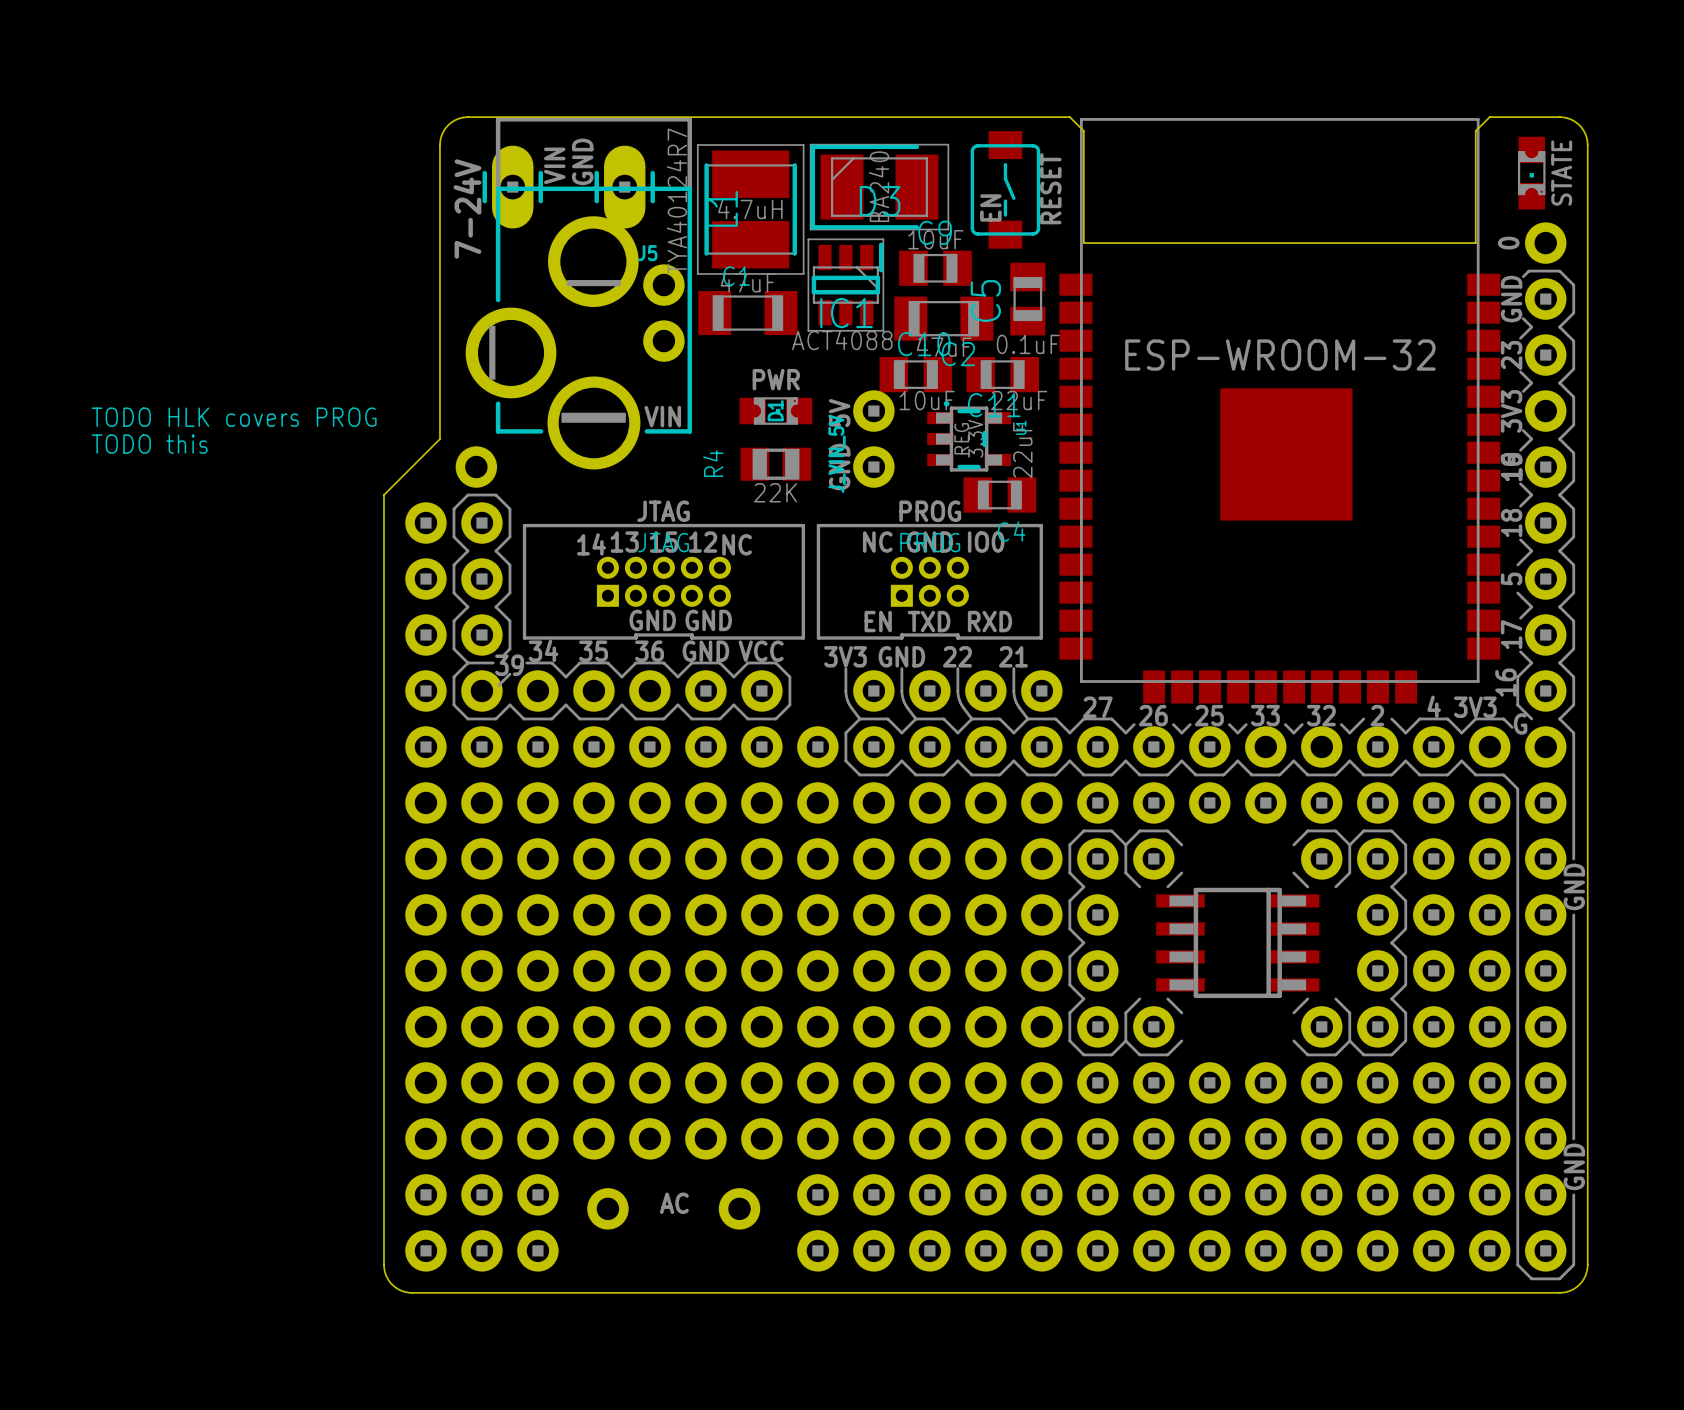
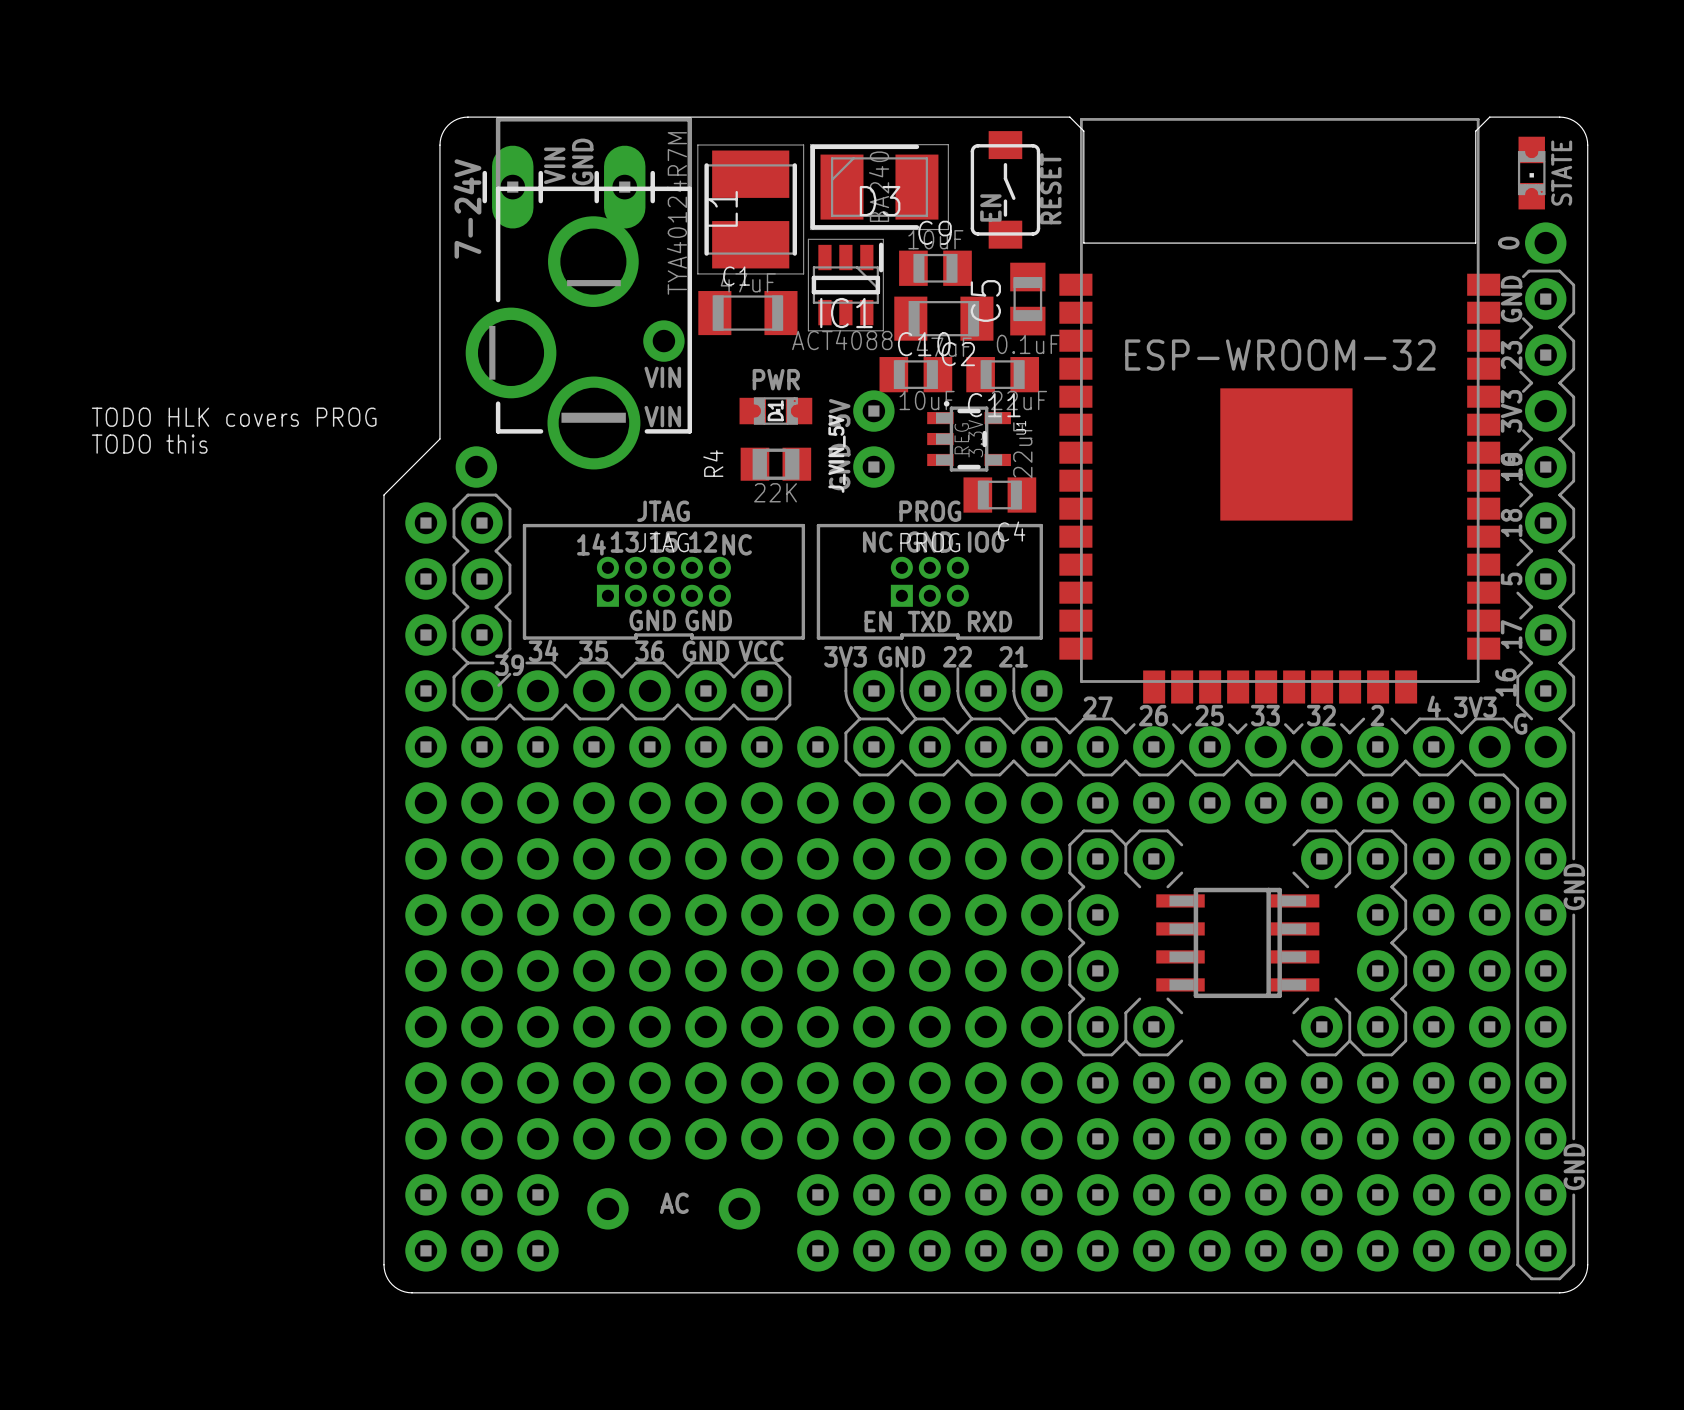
text: TYA40124R7 (676, 201) -> TYA40124R7M (676, 213)
text: 4.7uH (750, 209) -> none
J5: (663, 285) -> none
text: none -> VIN (662, 377)

